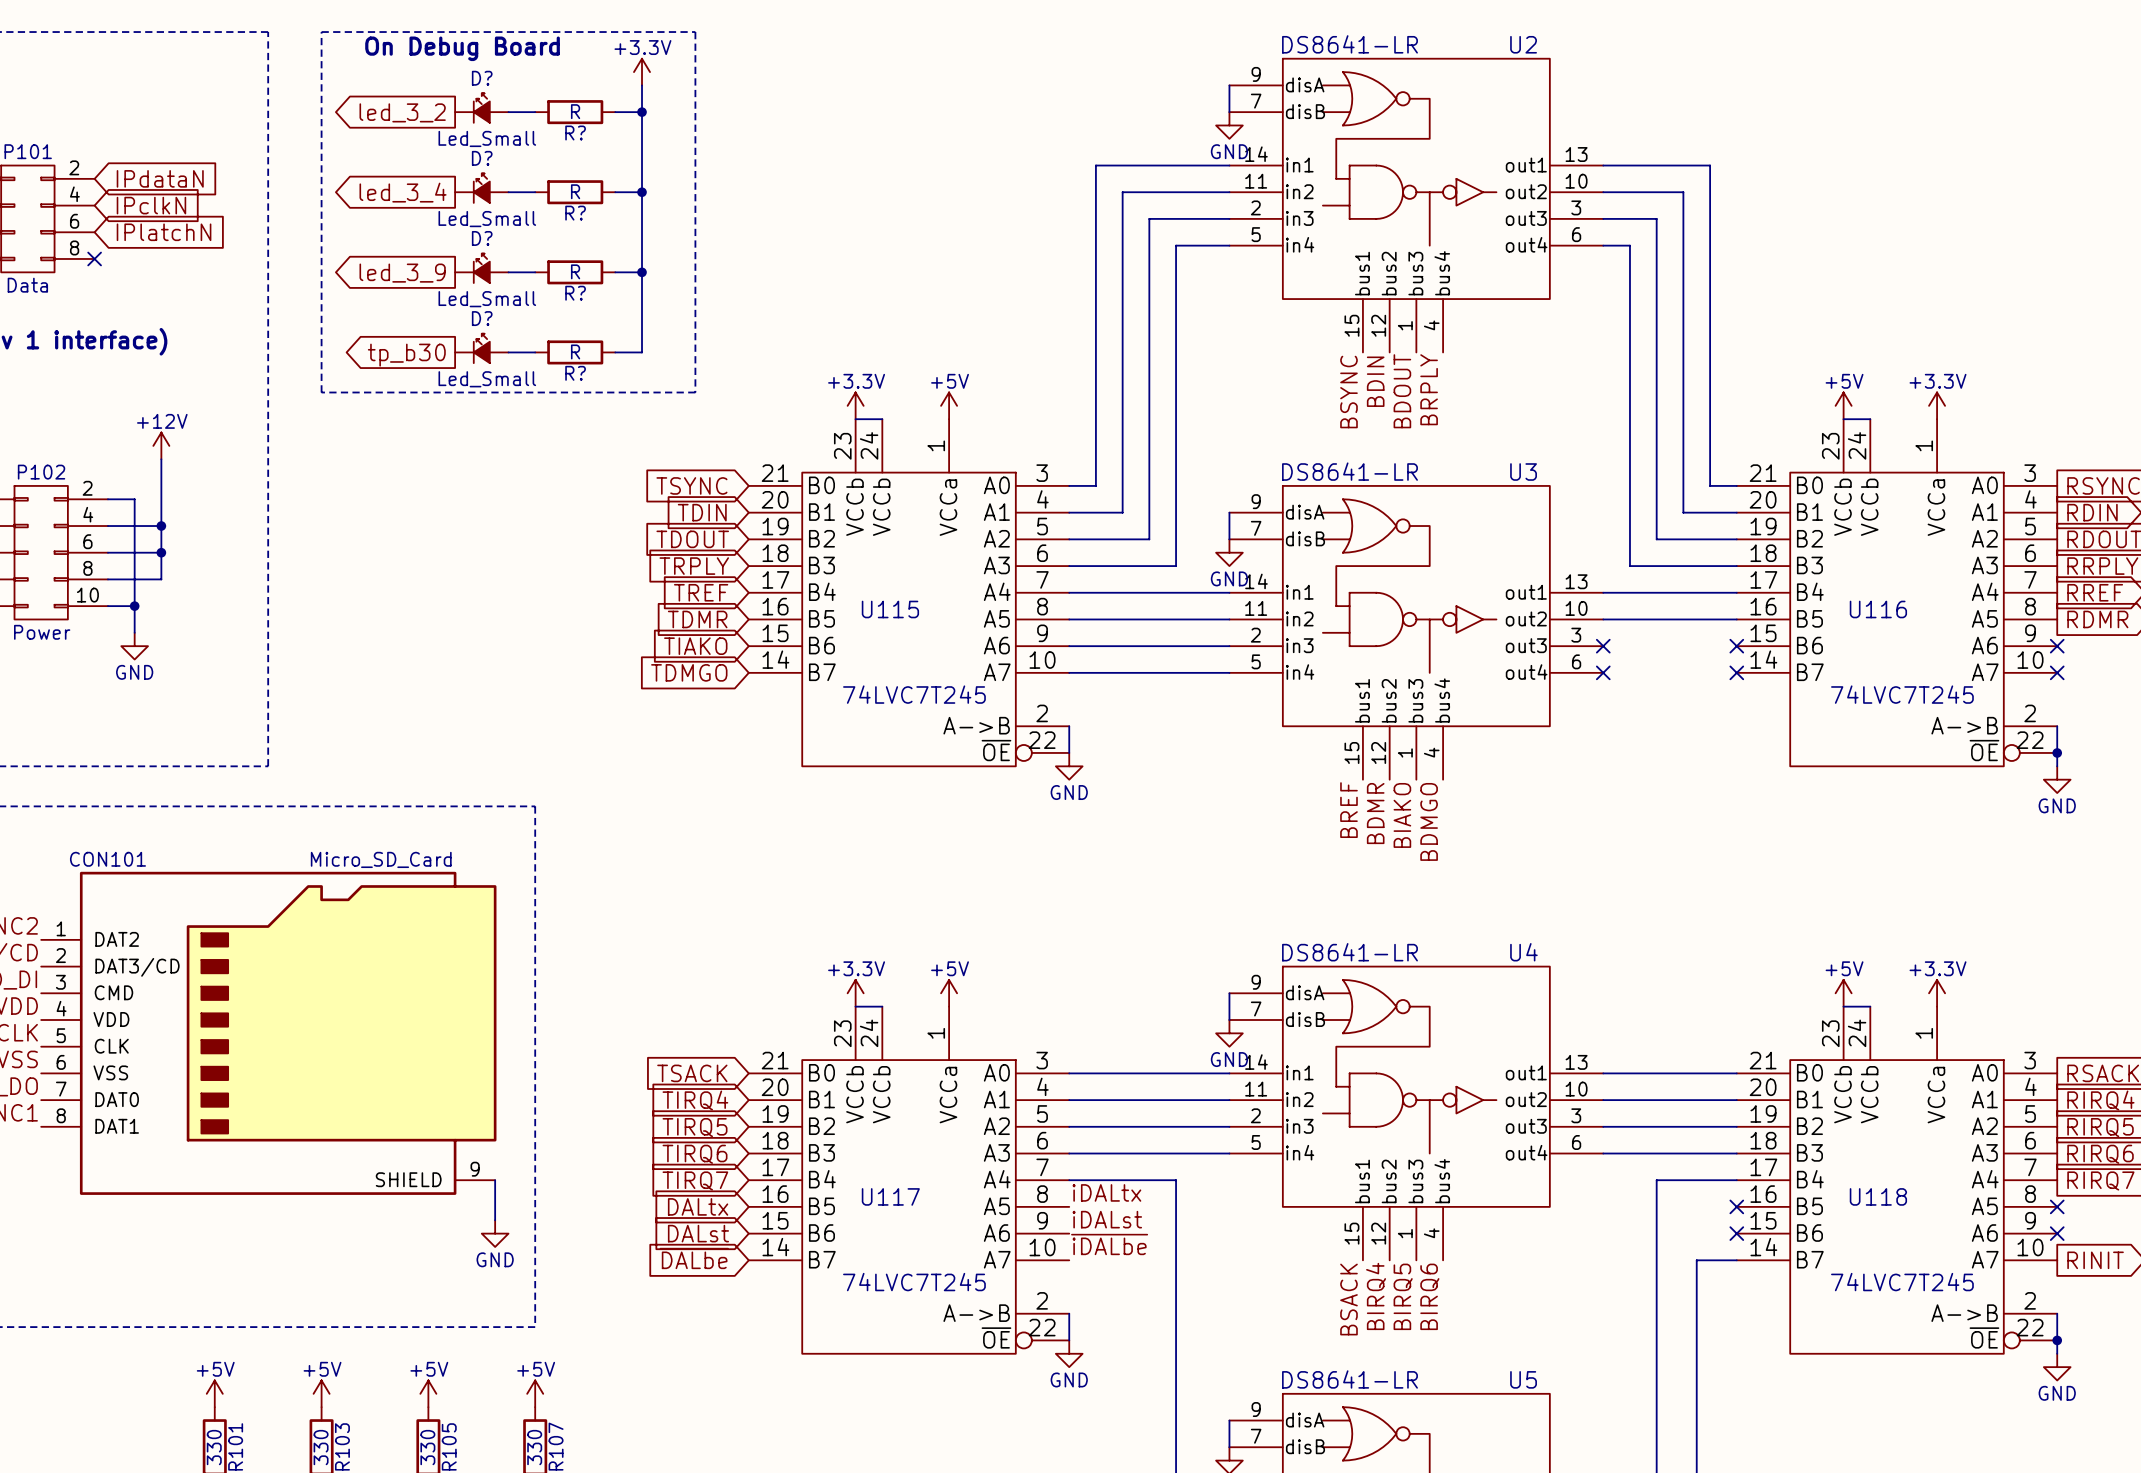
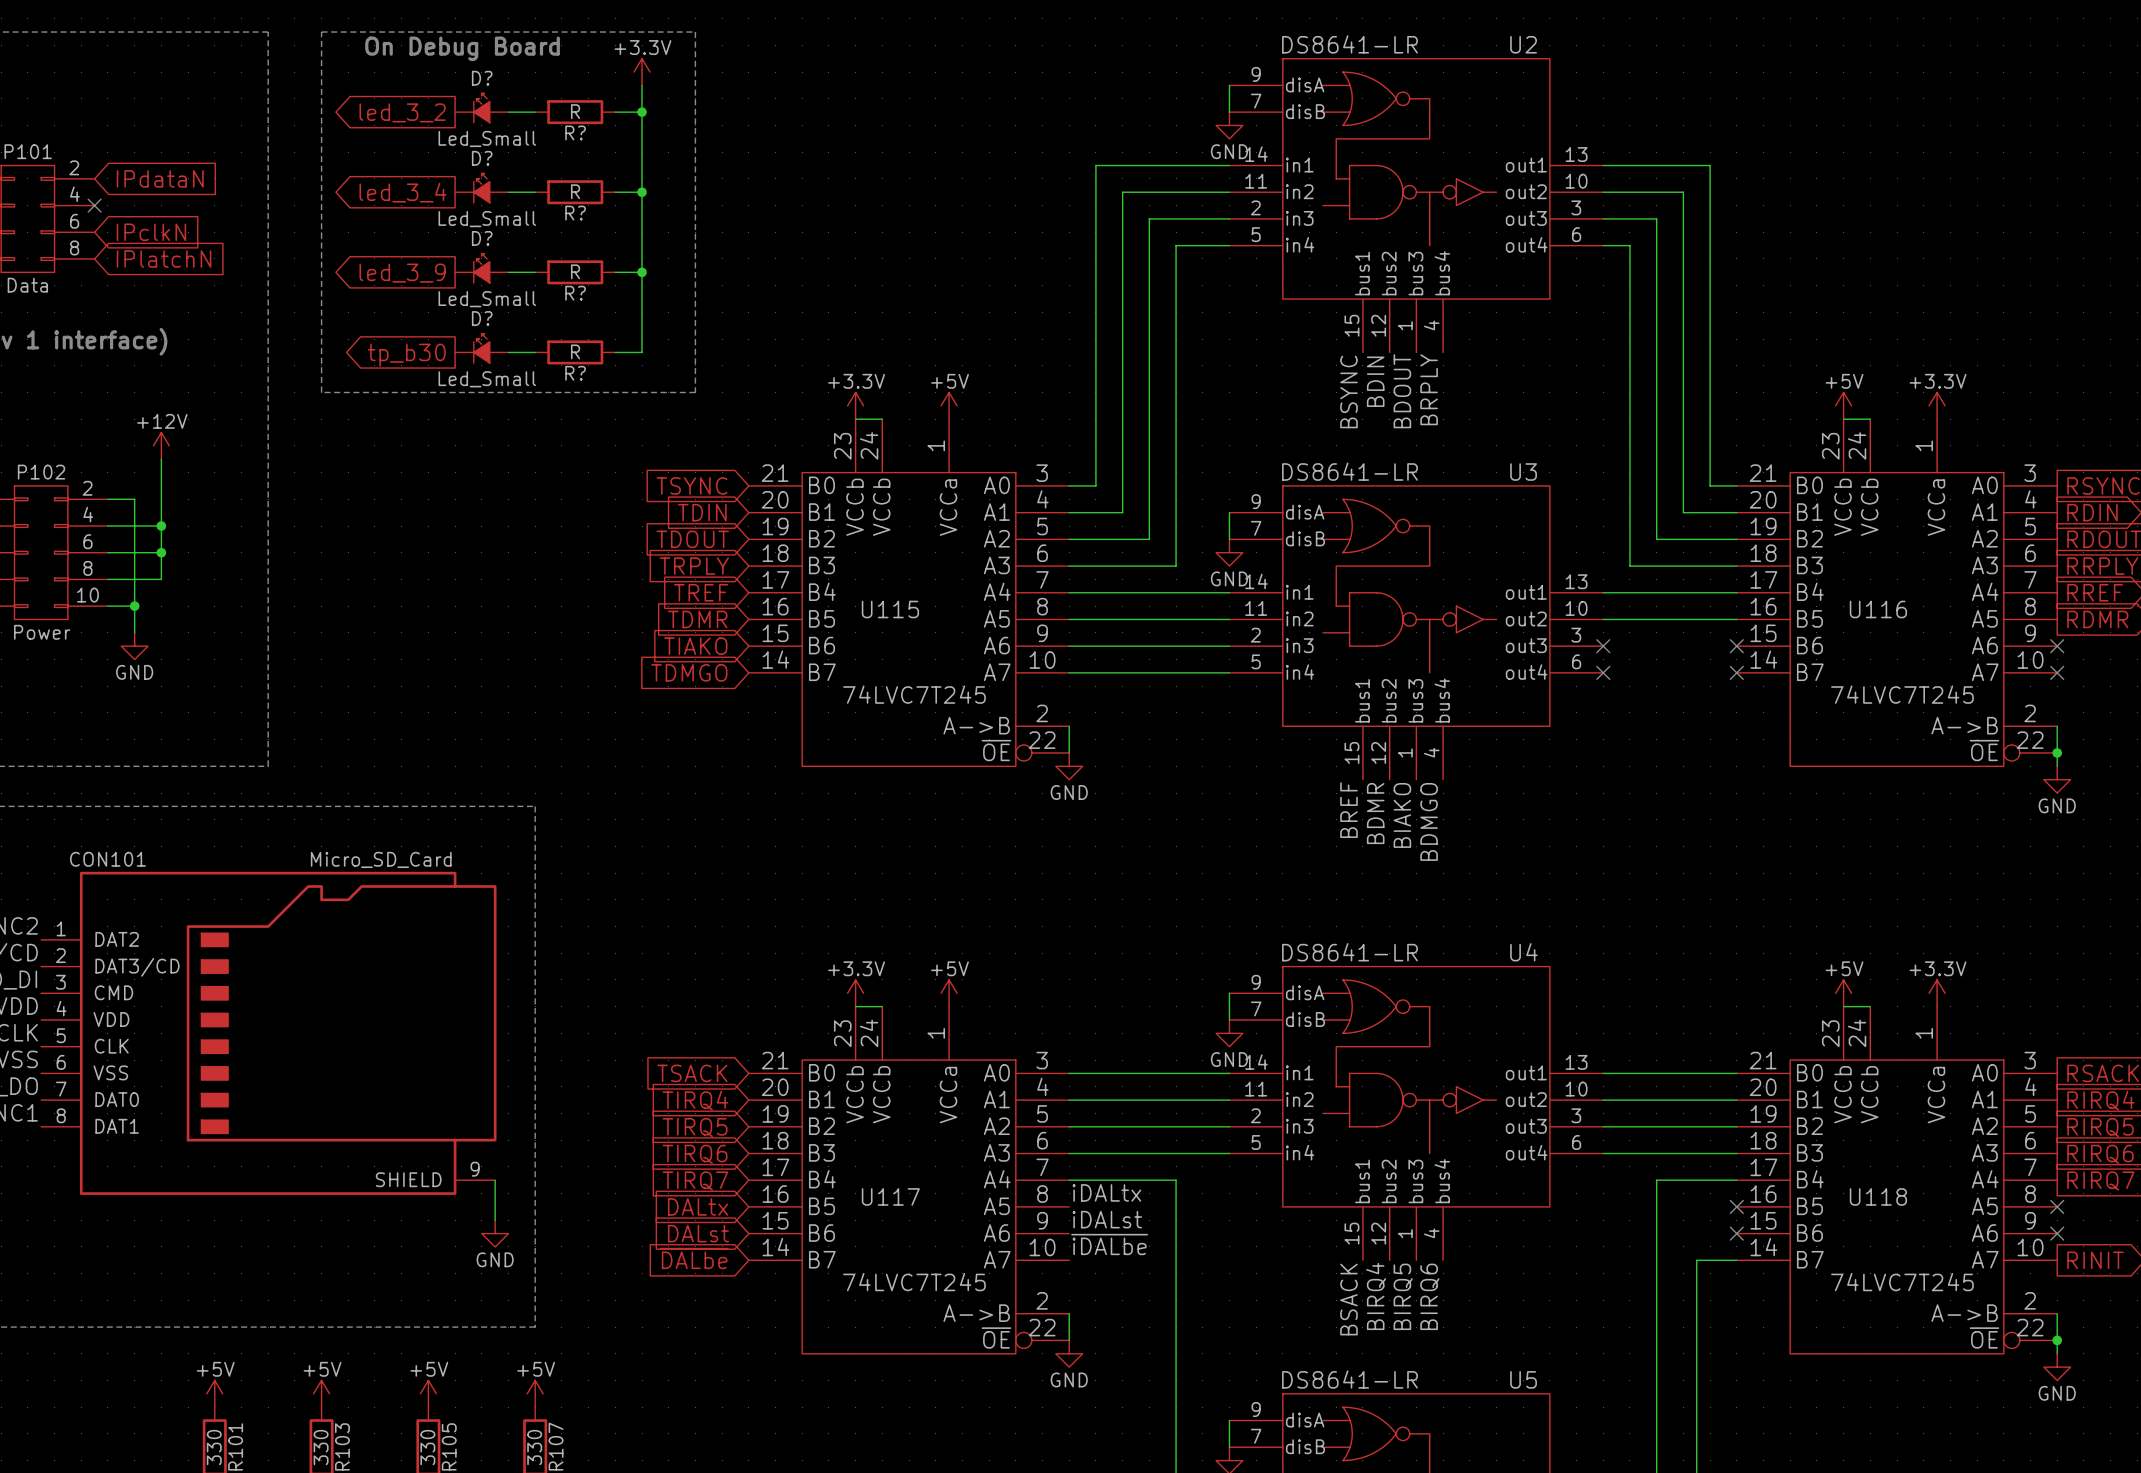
global label: IPclkN (151, 205) -> none
global label: IPlatchN (164, 232) -> IPclkN (151, 232)
no-connect mark position: (94, 258) -> (94, 205)
global label: none -> IPlatchN (164, 258)

